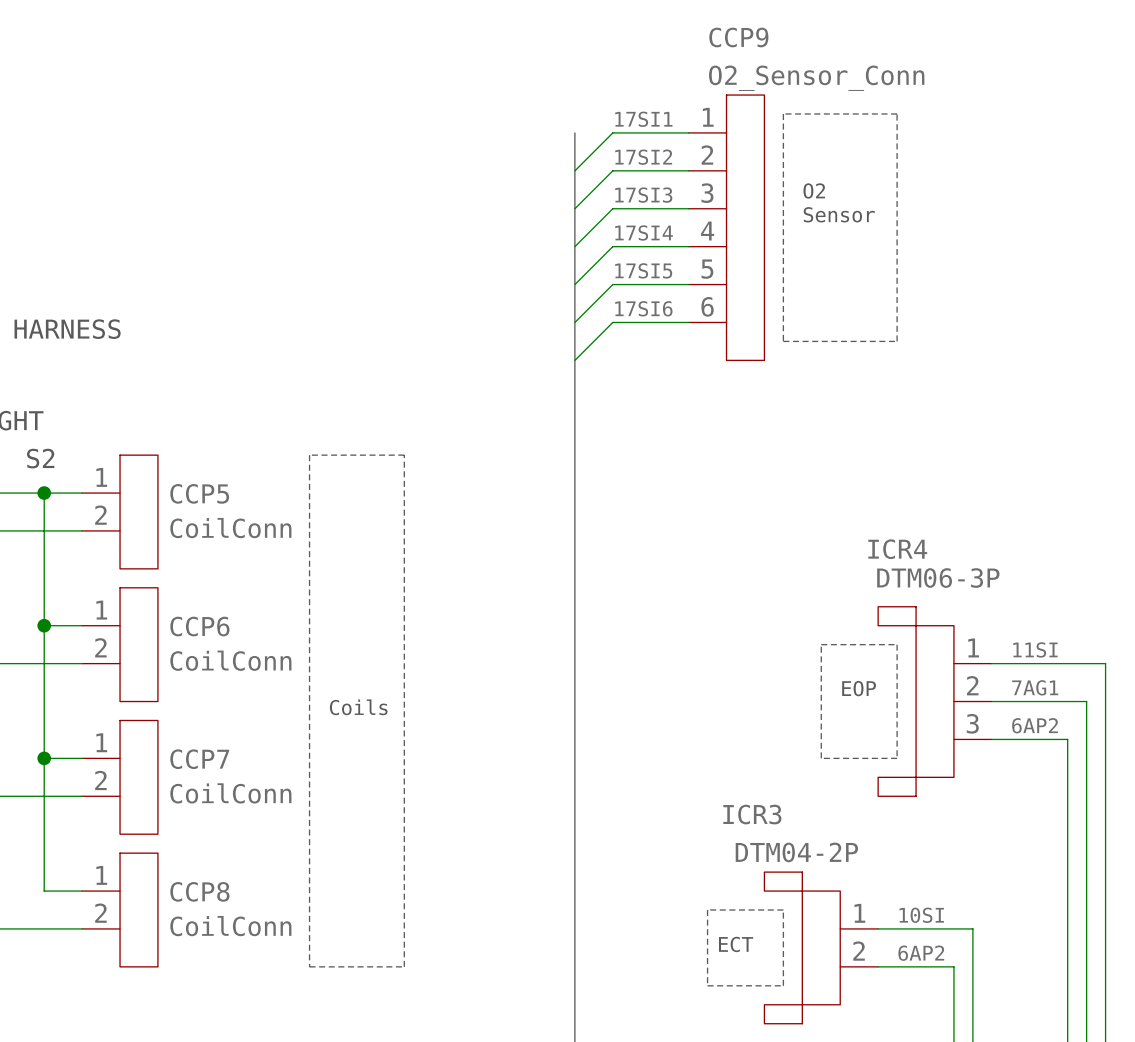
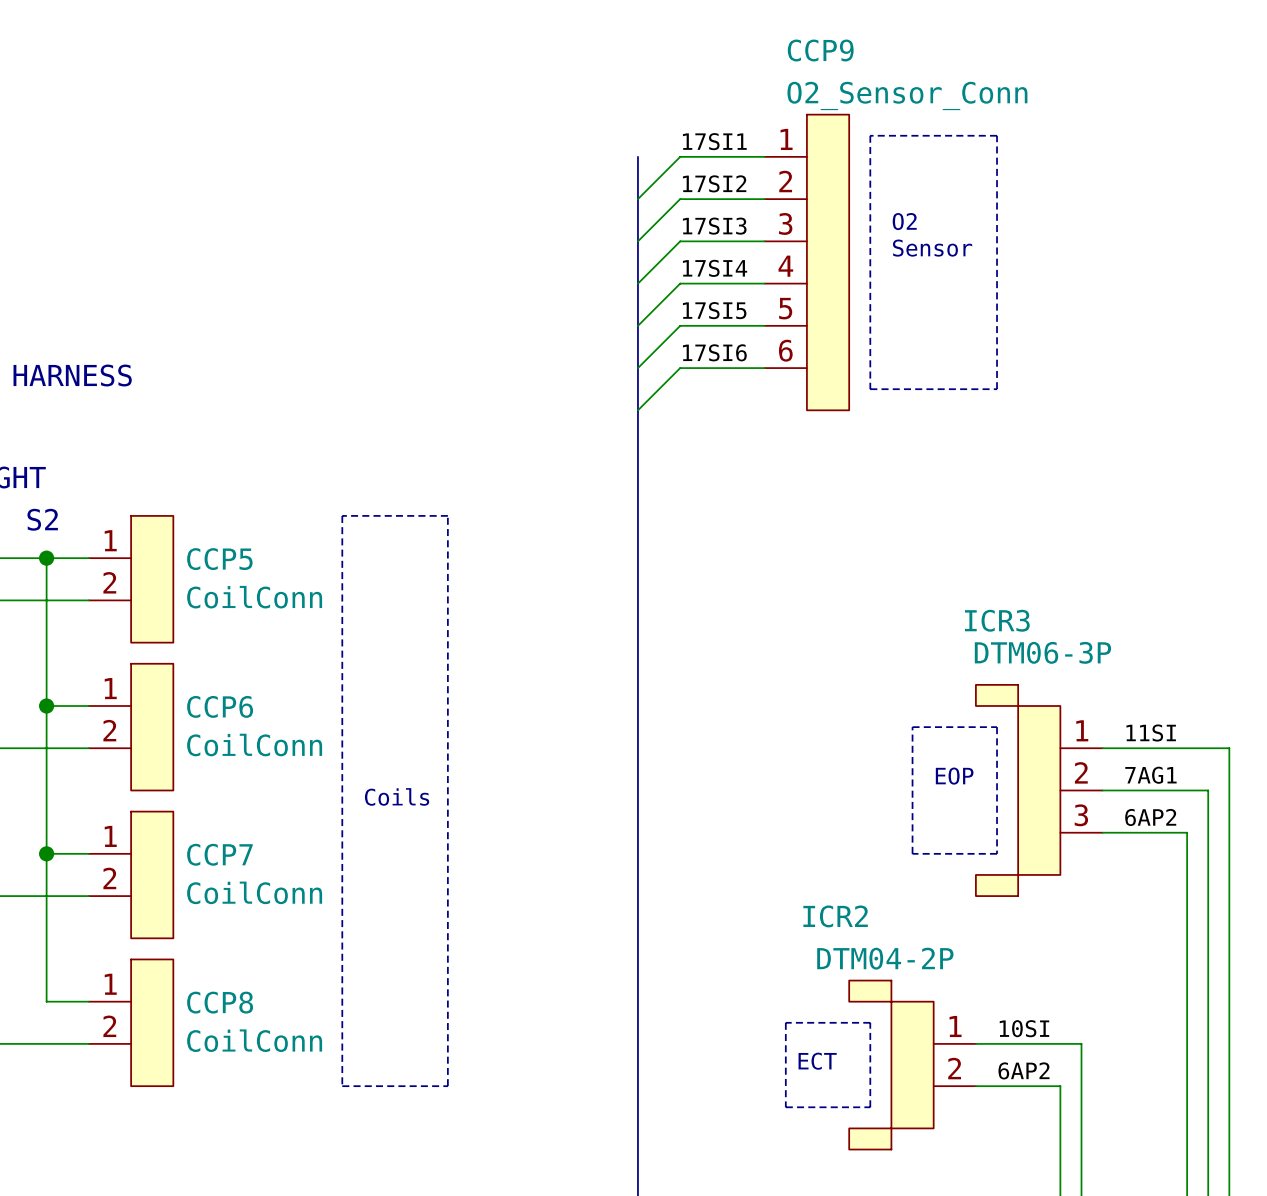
ICR4 name: ICR4 (897, 549) -> ICR3 (997, 620)
ICR3 name: ICR3 (752, 814) -> ICR2 (835, 916)

